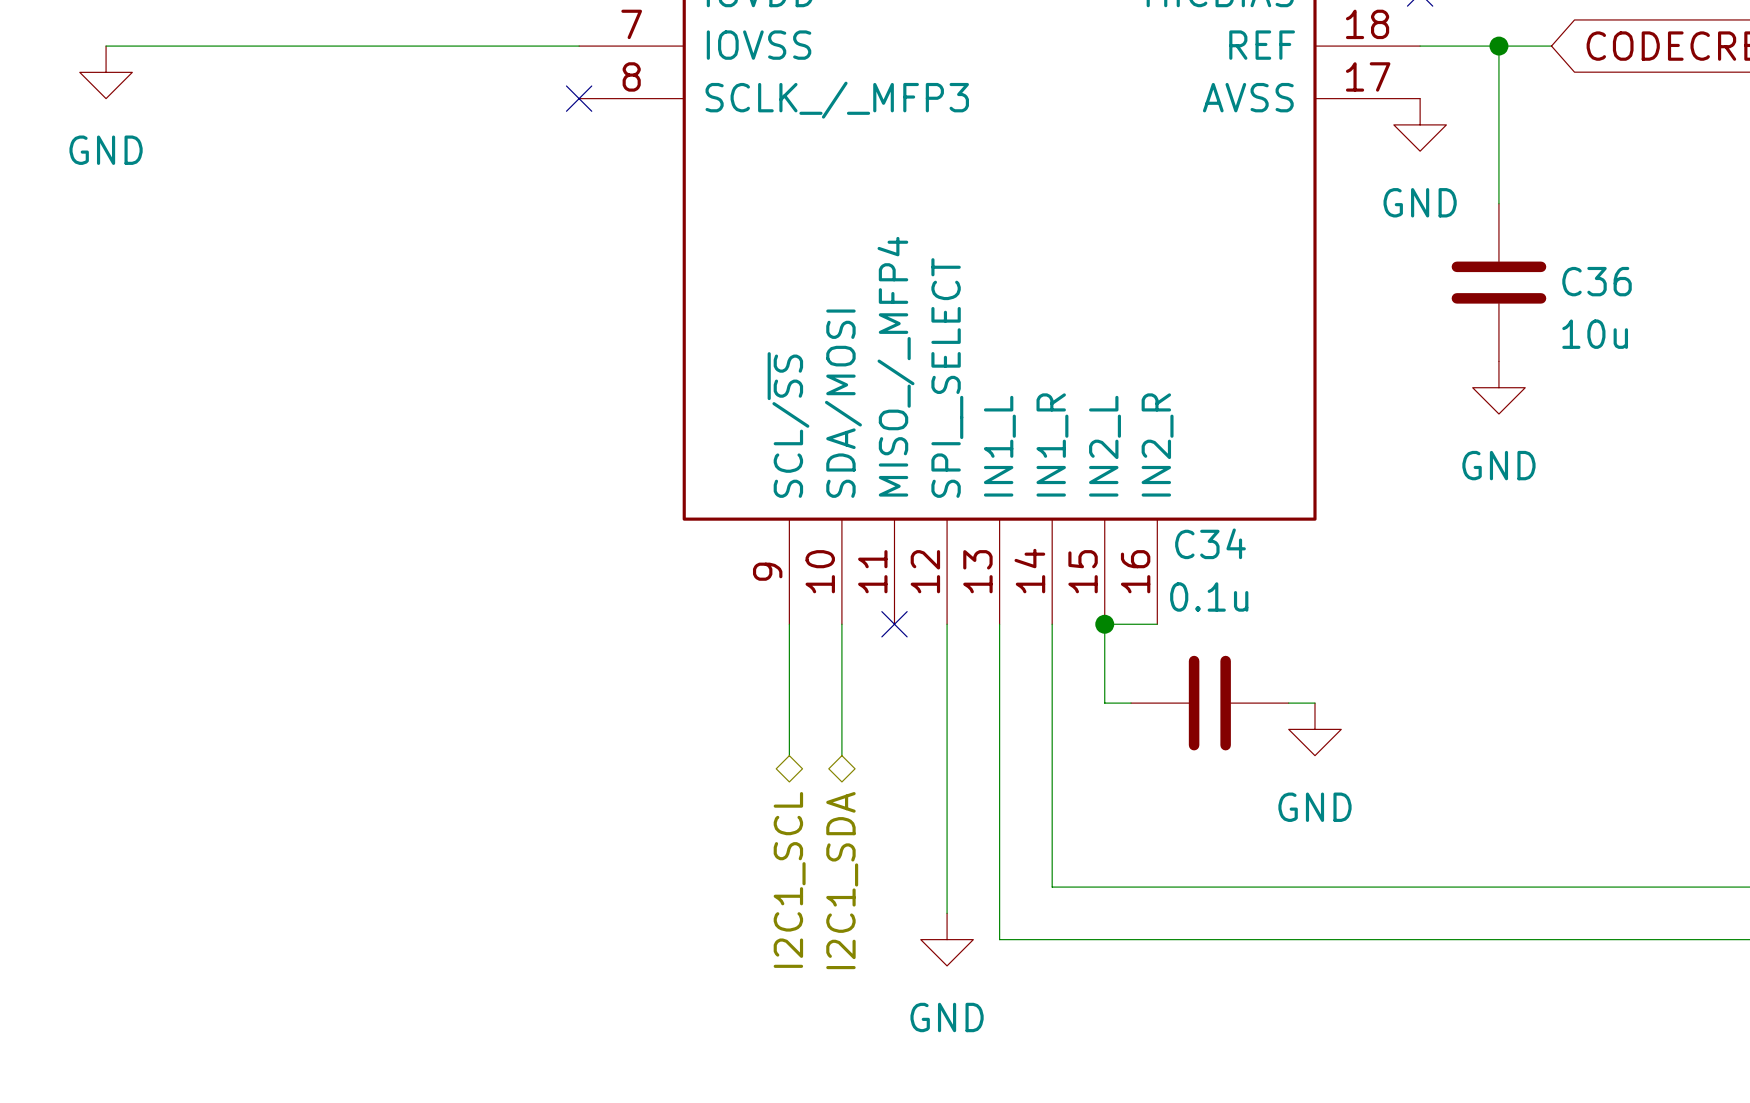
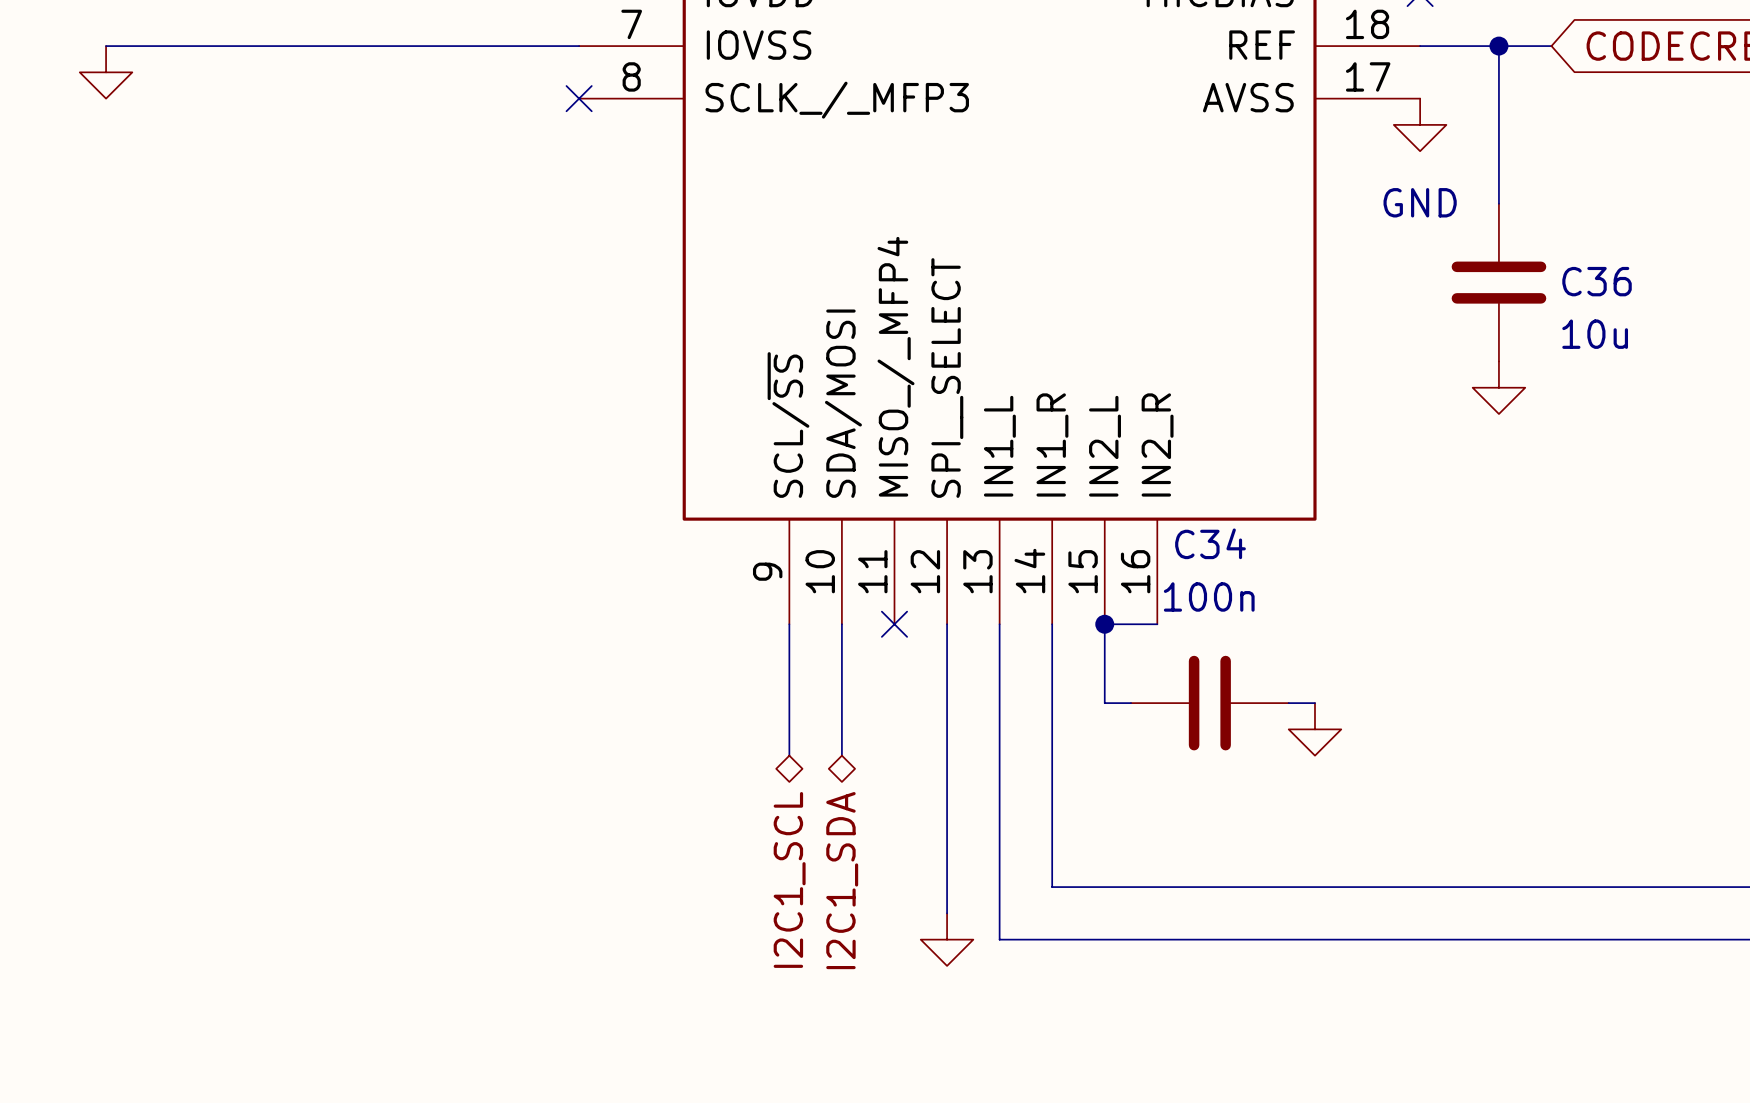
power symbol text: GND (106, 150) -> none
power symbol text: GND (1498, 465) -> none
C34 value: 0.1u (1209, 596) -> 100n (1209, 596)
power symbol text: GND (1314, 807) -> none
power symbol text: GND (947, 1017) -> none

